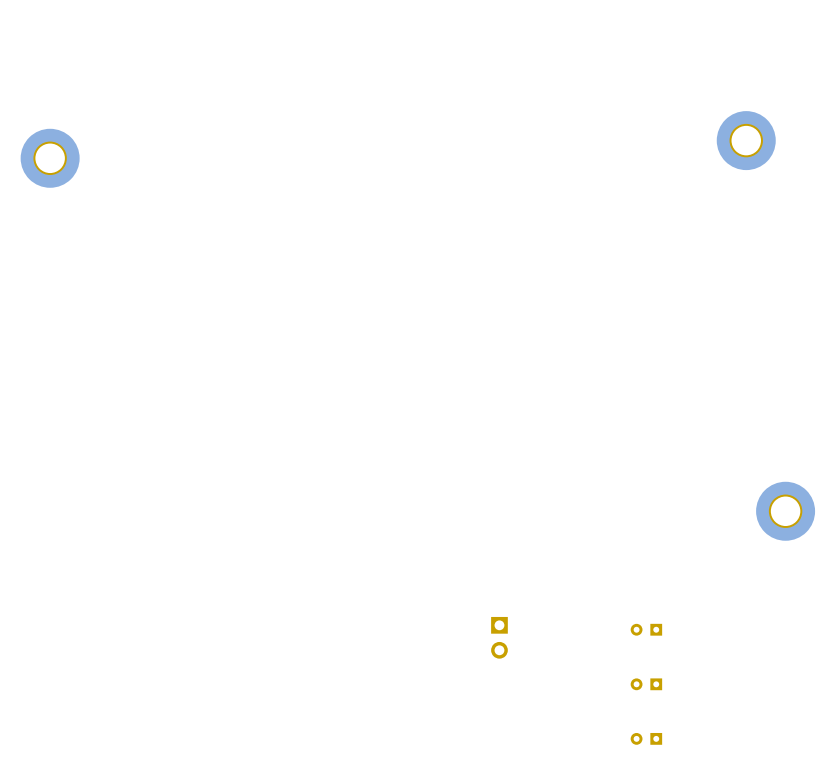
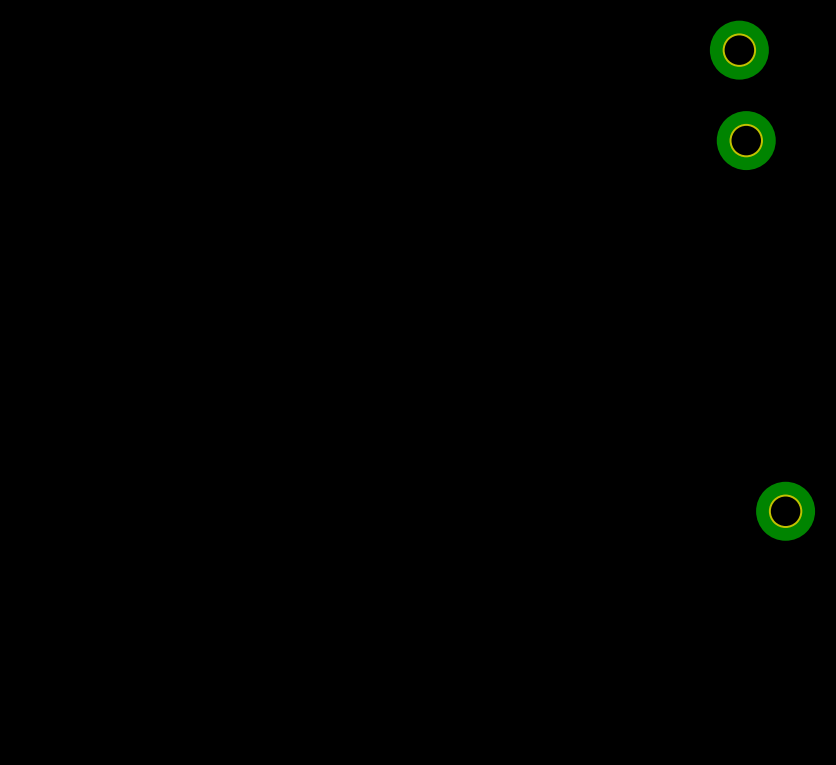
part: none -> (739, 50)
part: (50, 158) -> none
part: (646, 629) -> none
part: (499, 637) -> none
part: (646, 684) -> none
part: (646, 738) -> none

